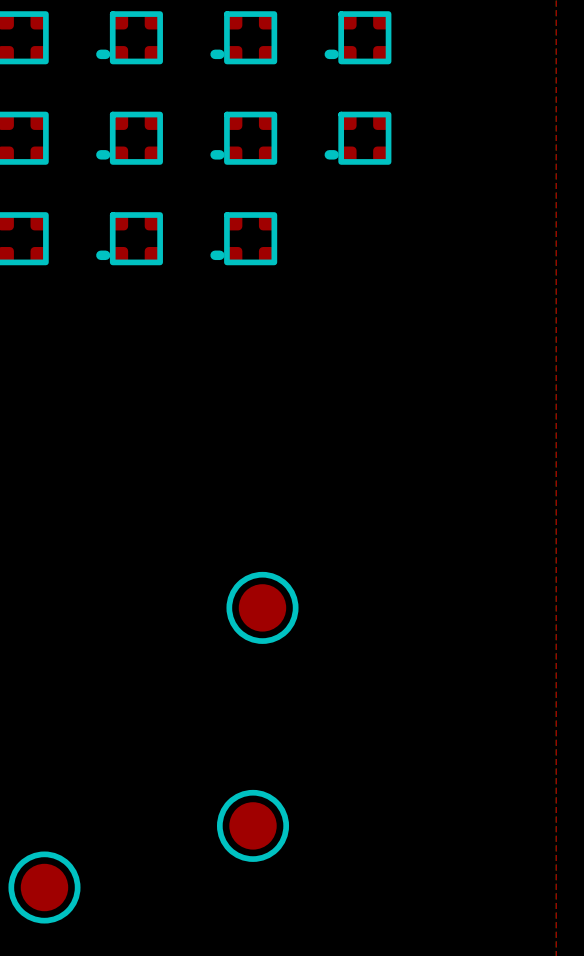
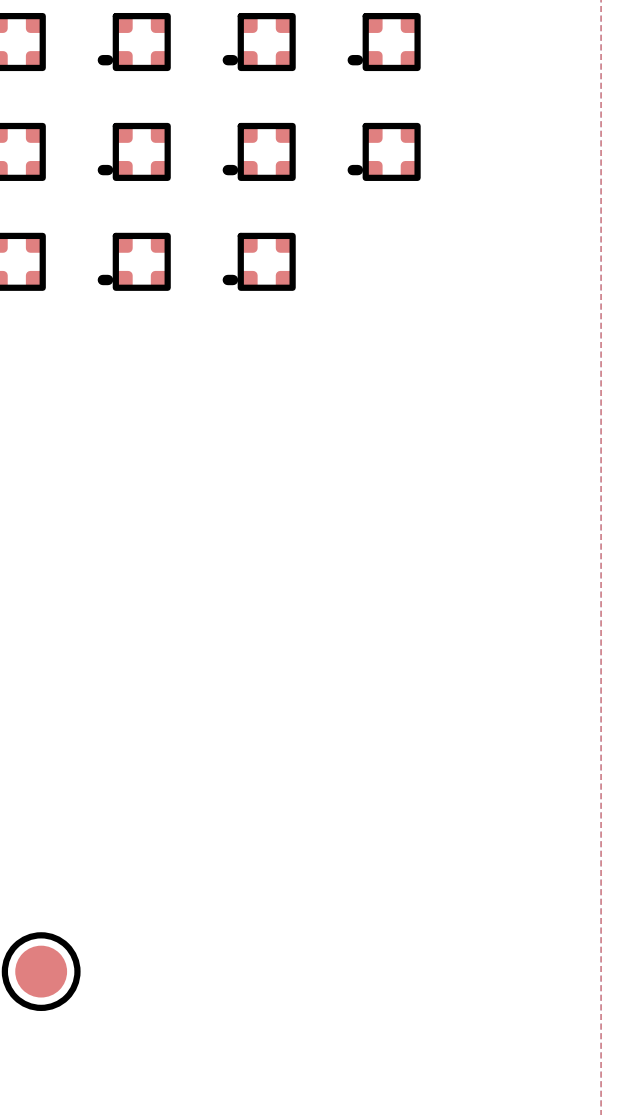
part: (262, 607) -> none
part: (253, 825) -> none

